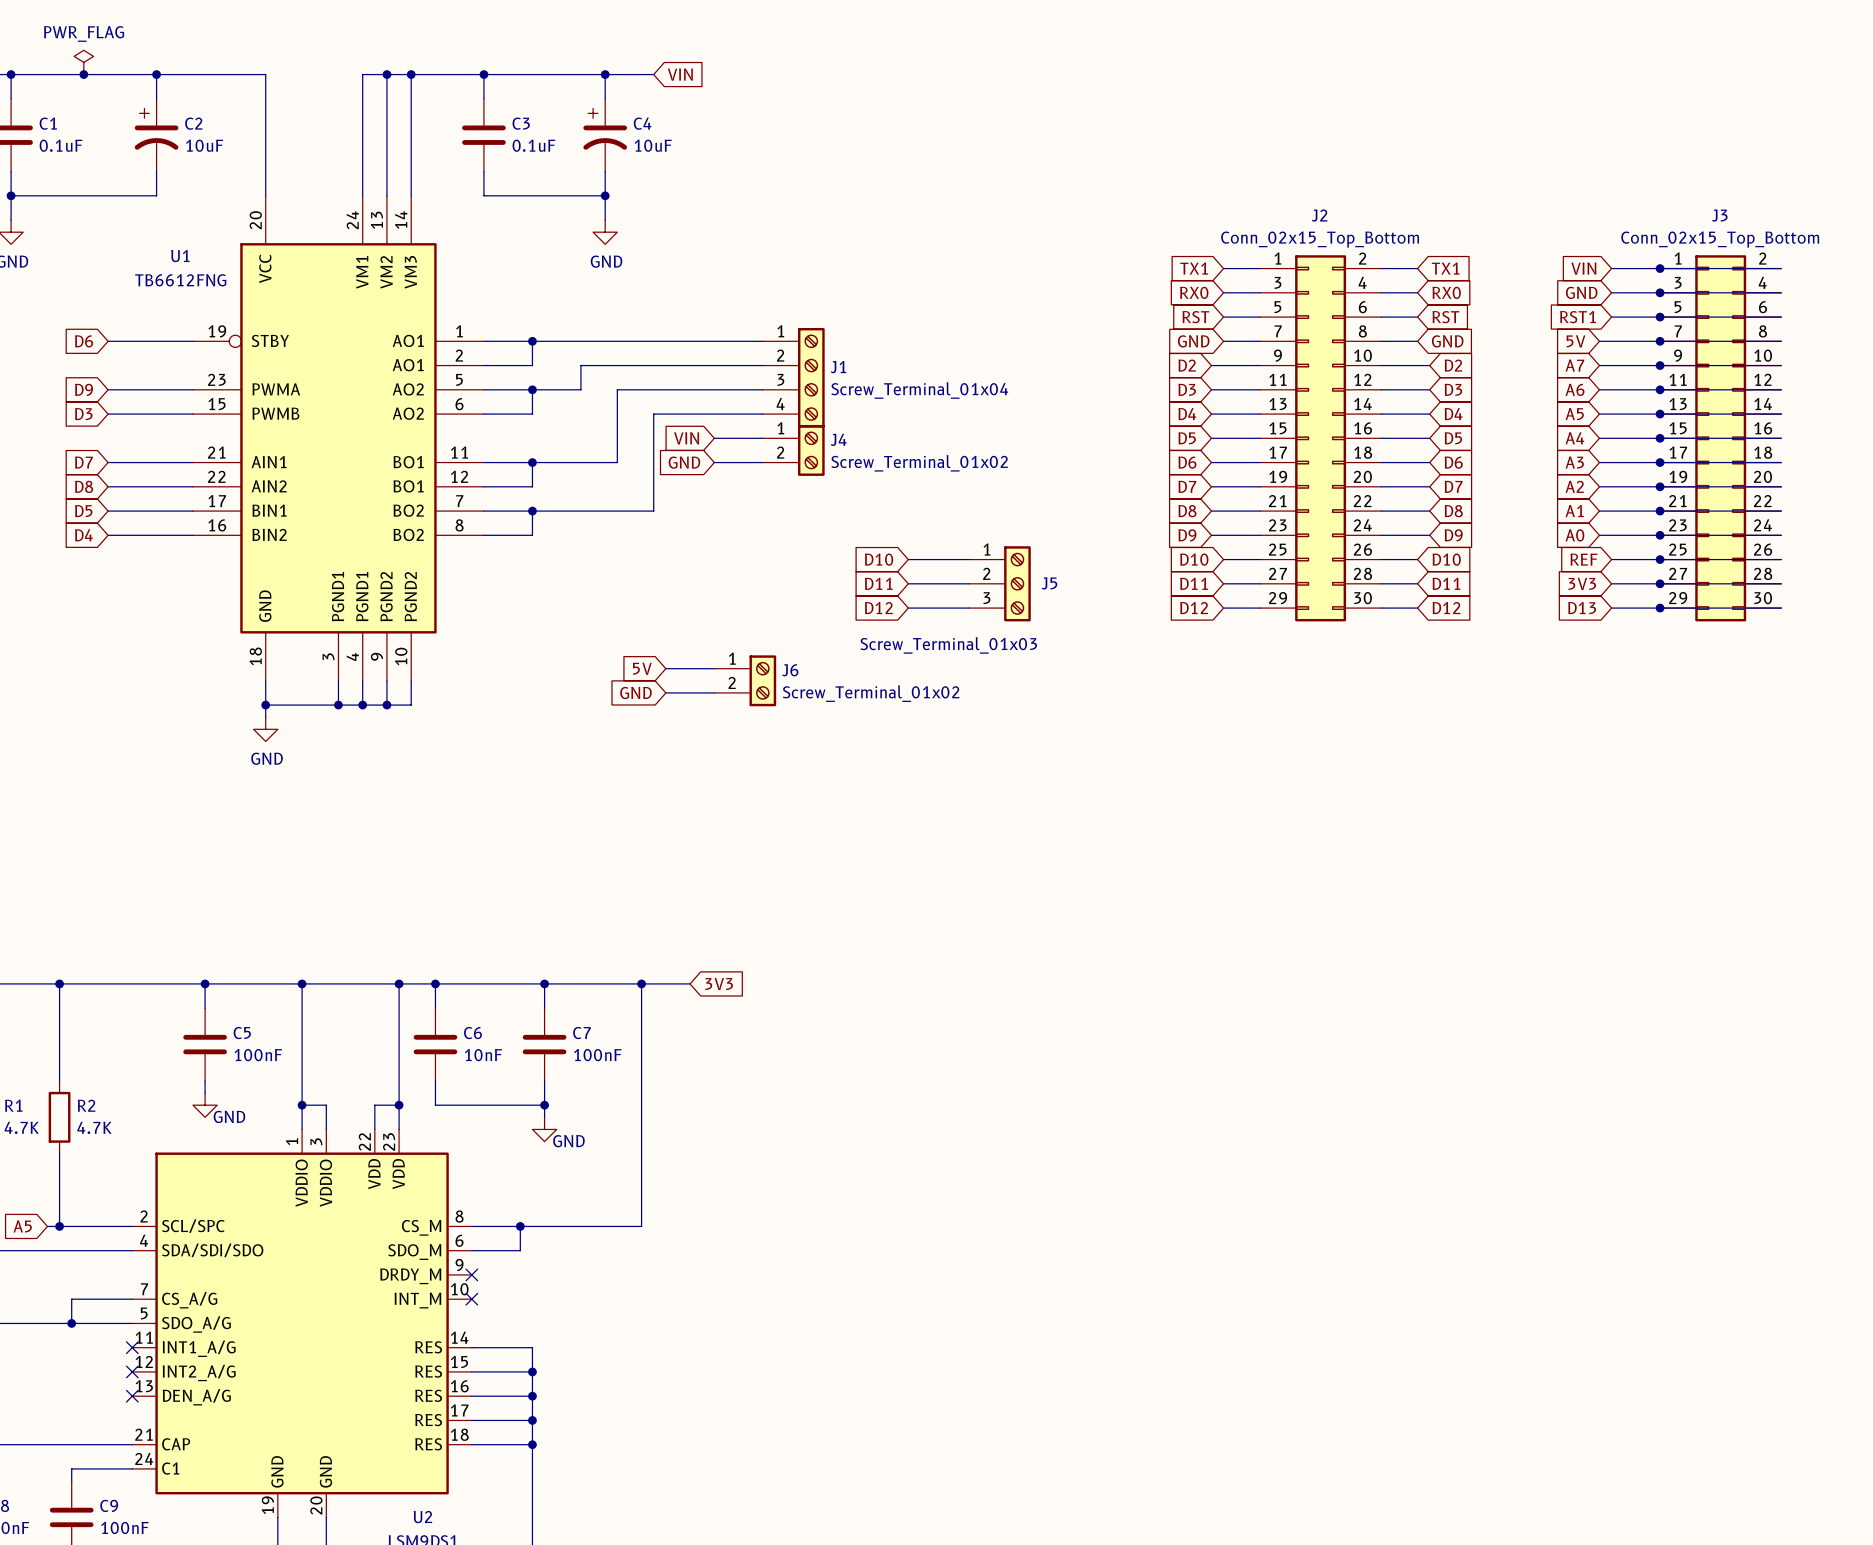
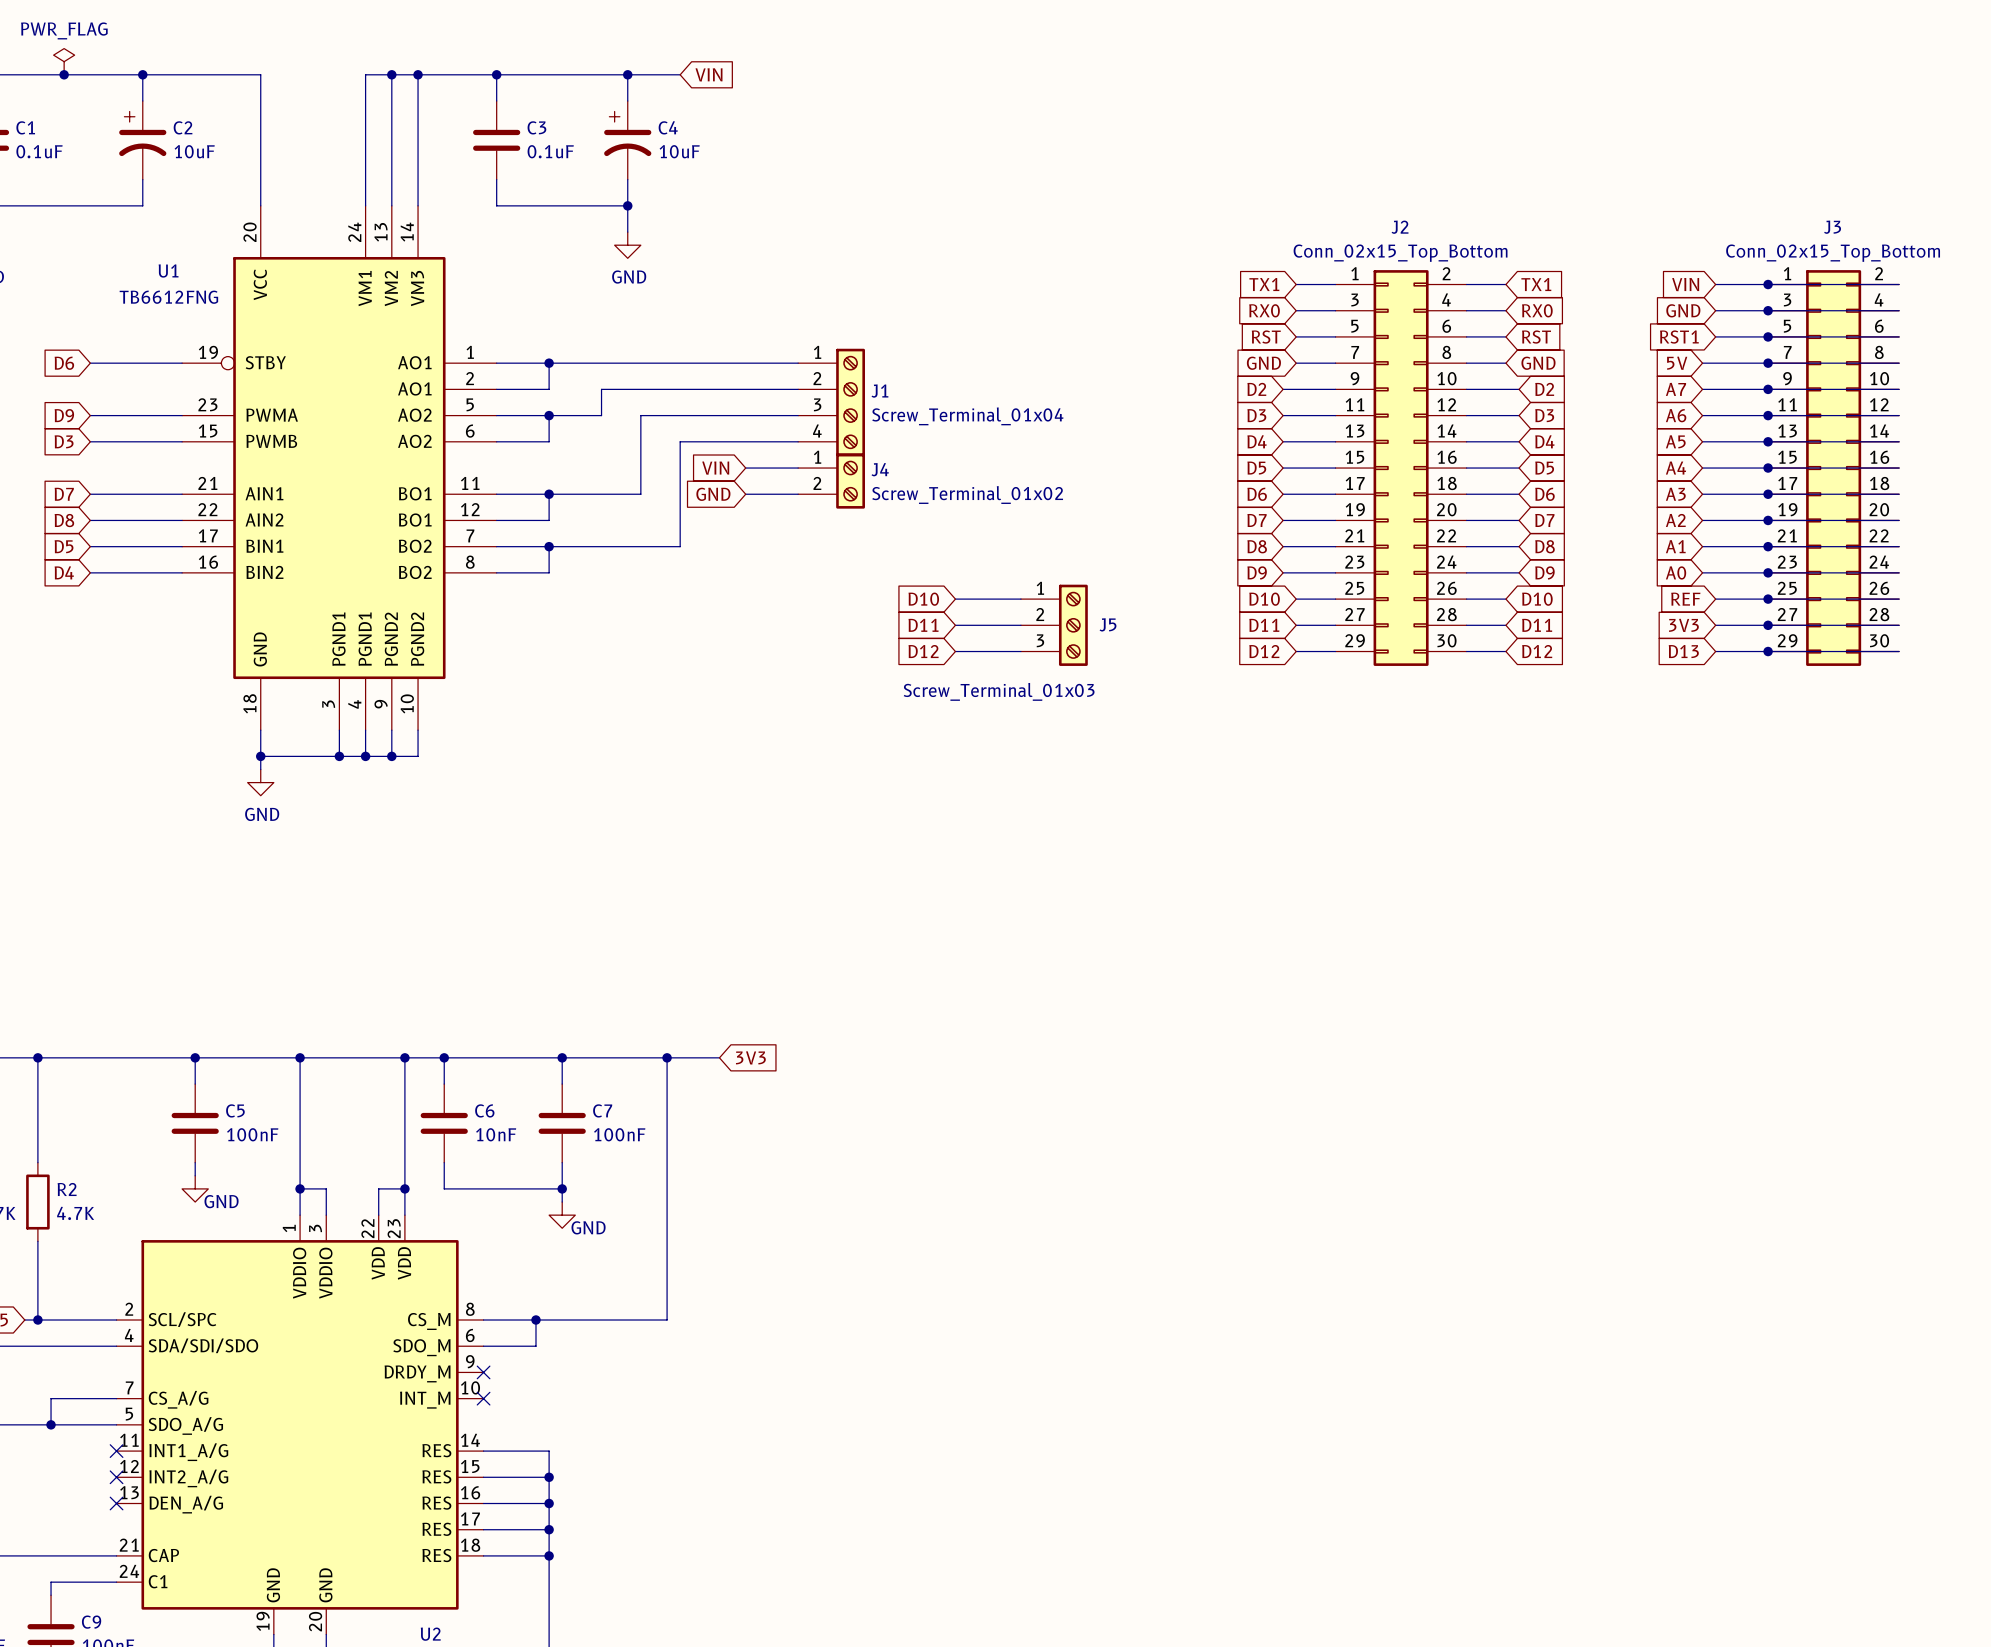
global label: 5V (642, 668) -> none
wire: (665, 668) (714, 668) -> none
J6: Screw_Terminal_01x02 (745, 680) -> none
wire: (665, 692) (714, 692) -> none
global label: GND (635, 693) -> none

